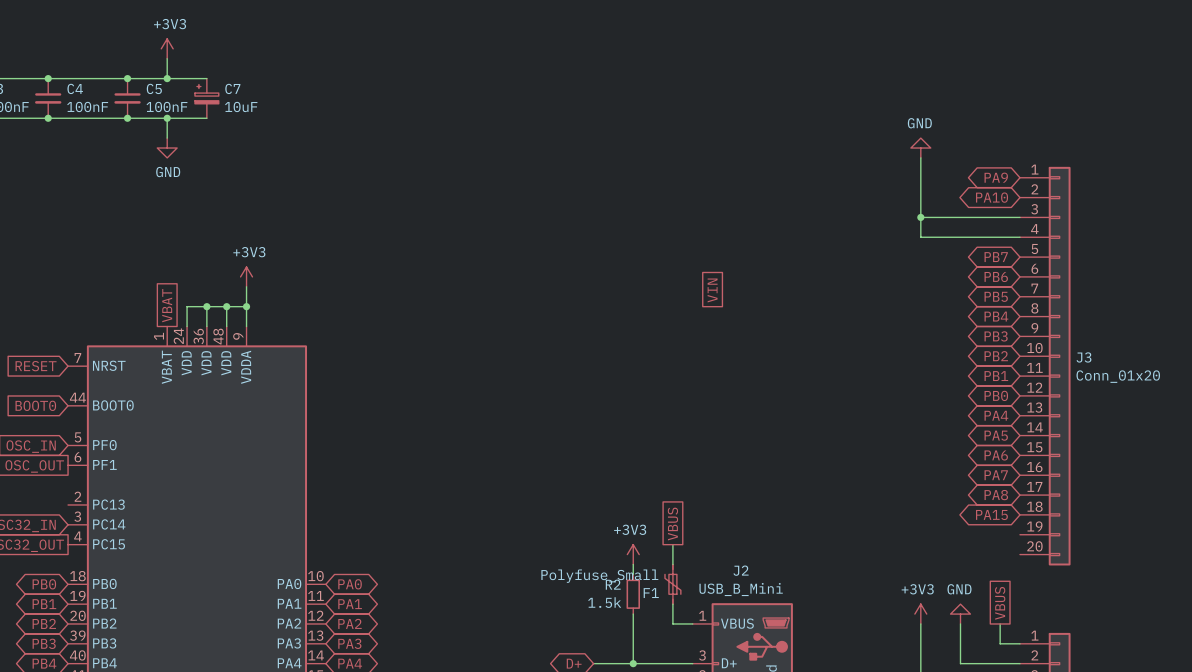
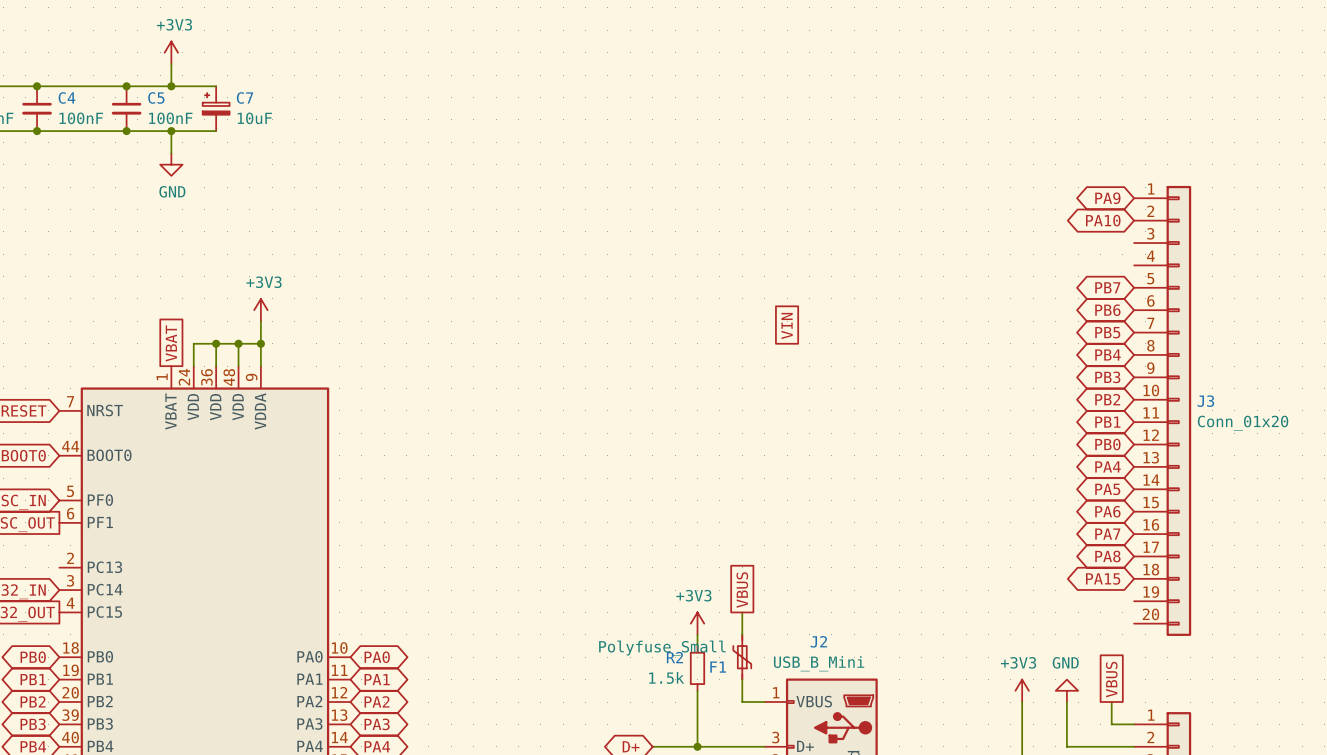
power symbol: GND (920, 148) -> none
wire: (920, 157) (920, 237) (1019, 237) -> none
wire: (920, 217) (1019, 217) -> none
junction: (920, 217) -> none

